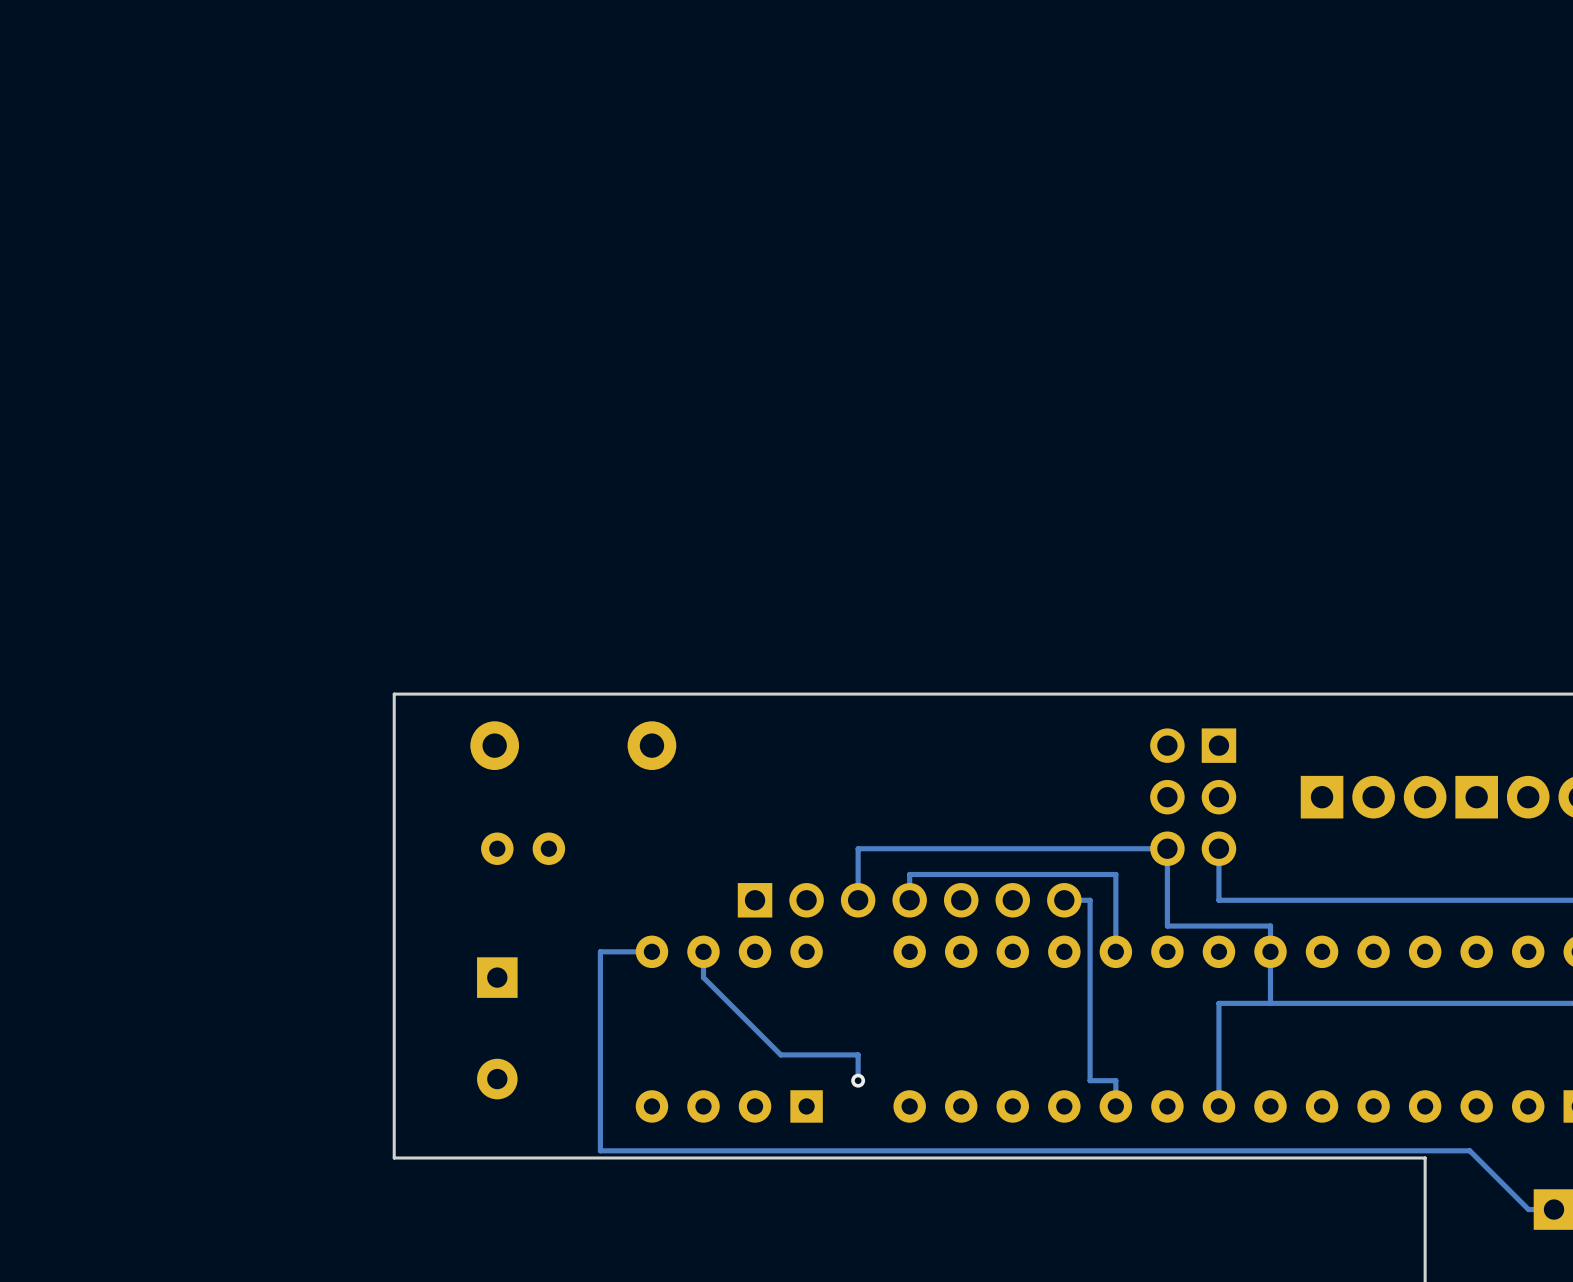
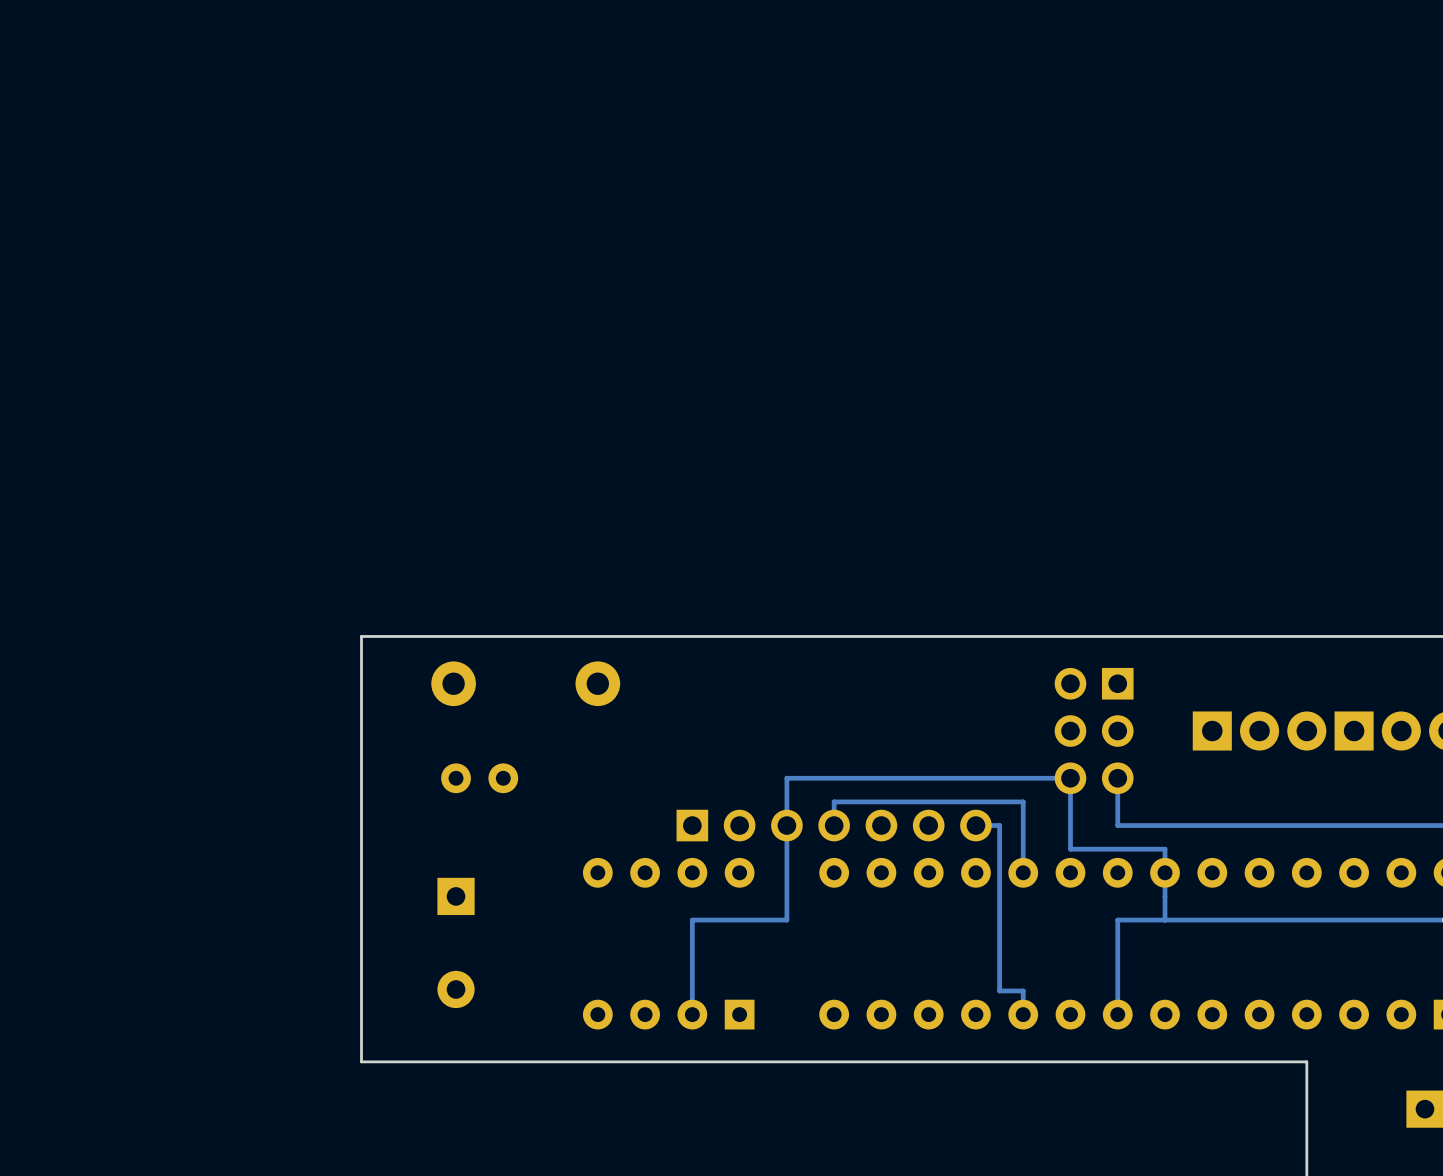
track: none -> (786, 825) (786, 920) (692, 920) (692, 1014)
track: (651, 951) (600, 951) (600, 1150) (1469, 1150) (1528, 1209) (1554, 1209) -> none
track: (703, 951) (703, 977) (780, 1054) (858, 1054) (858, 1080) -> none
via: (858, 1080) -> none

